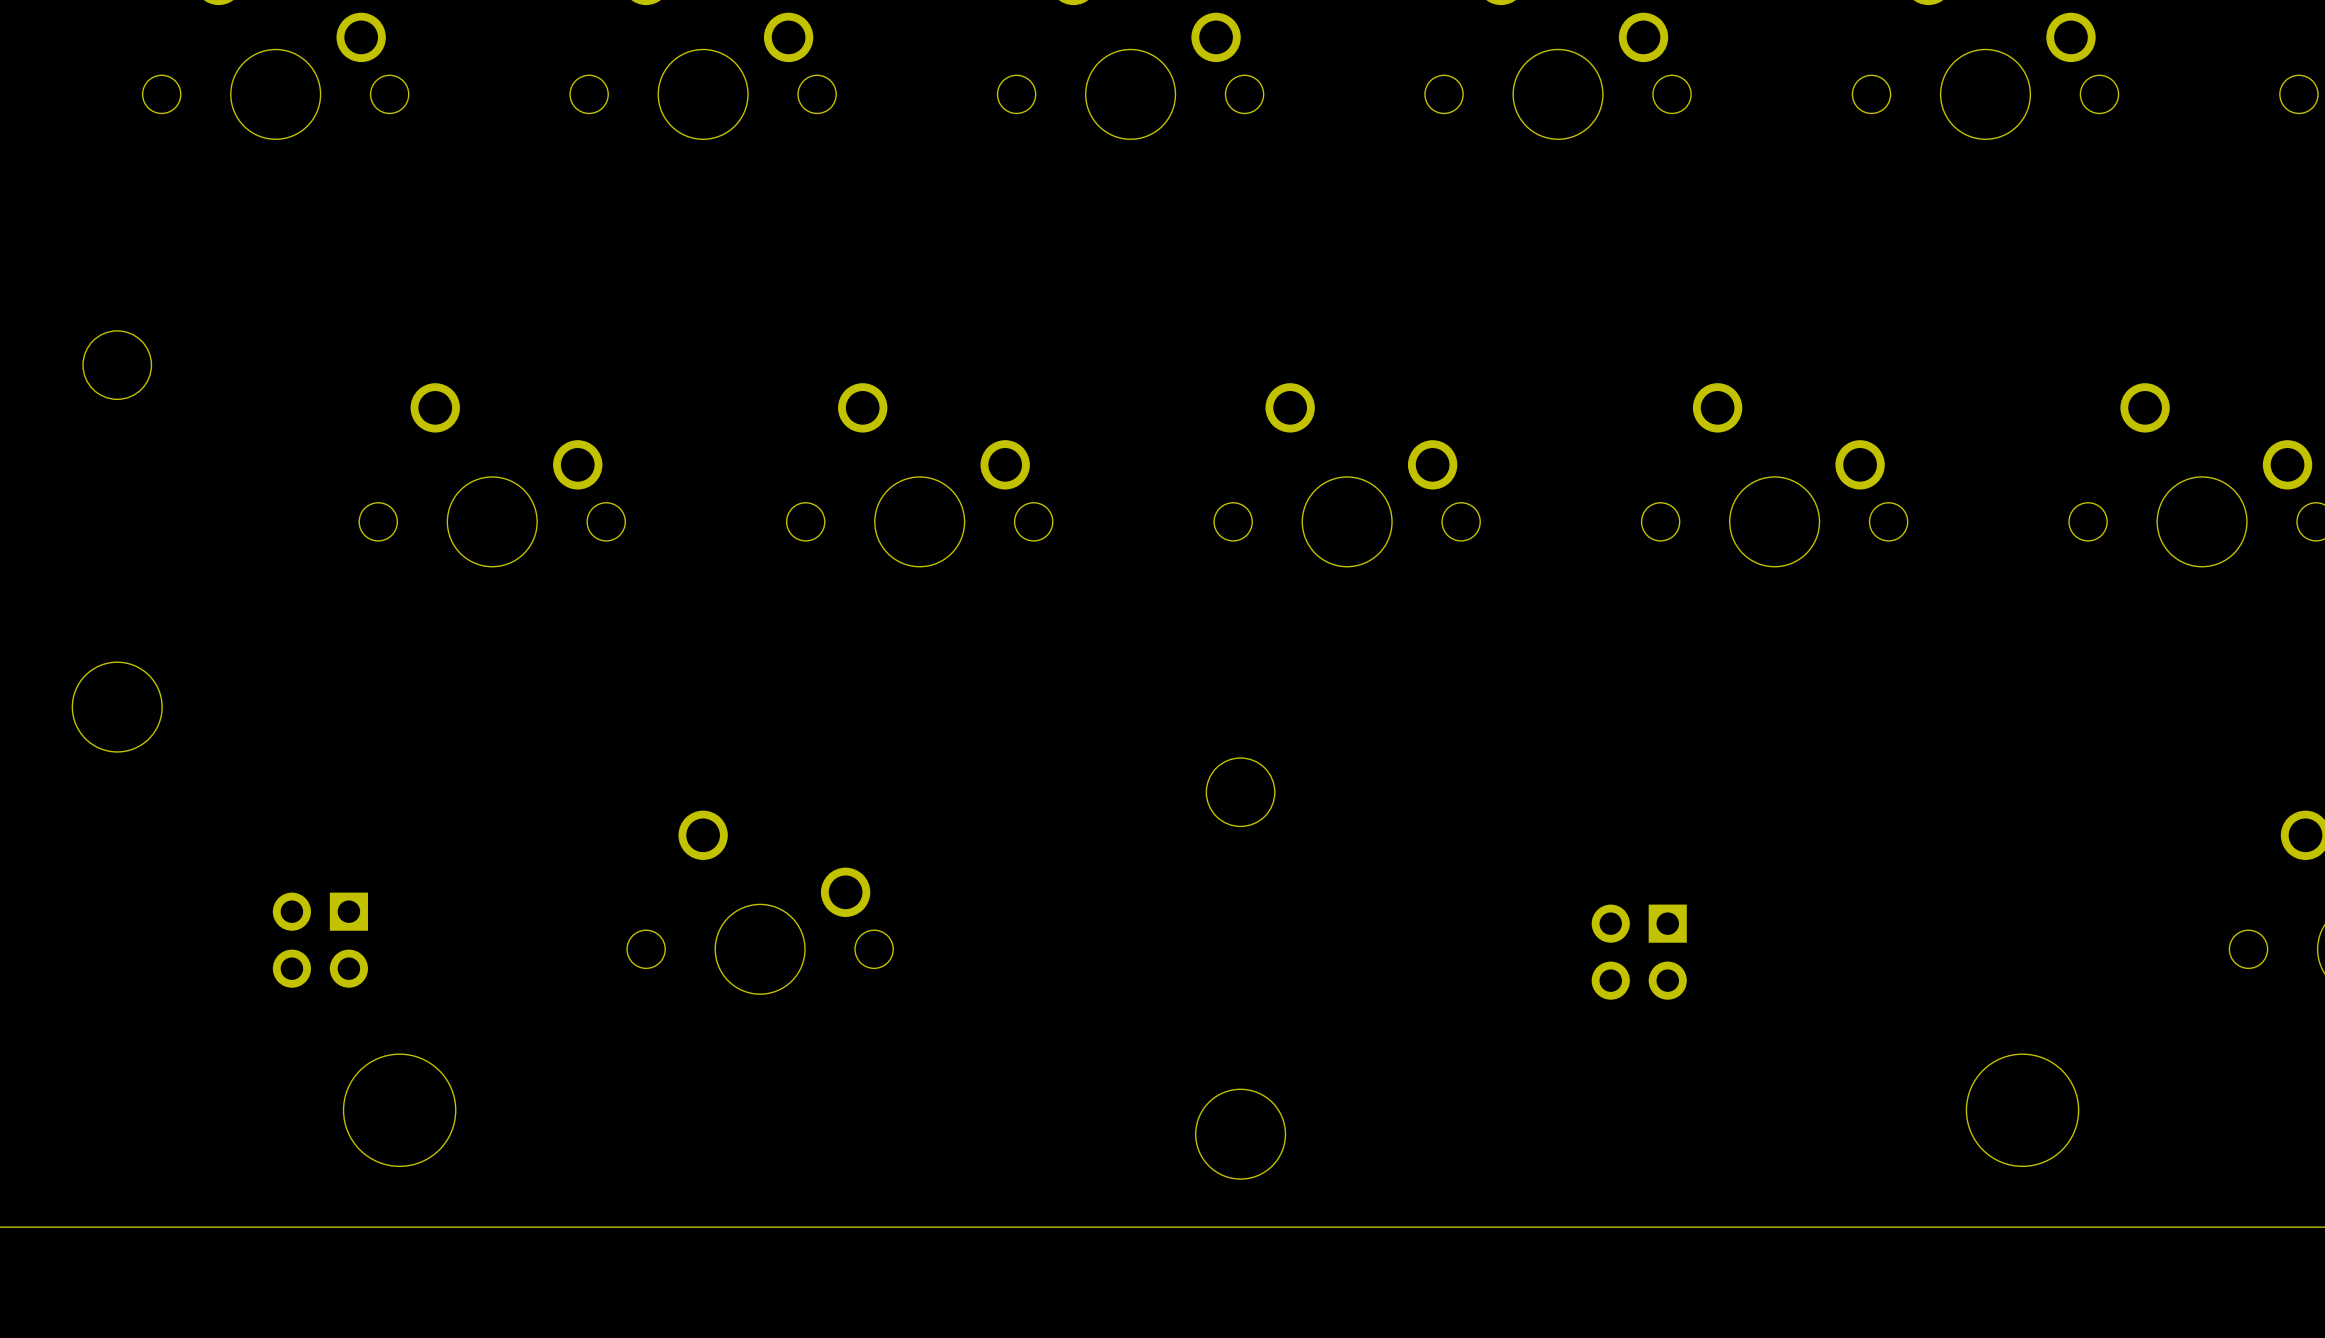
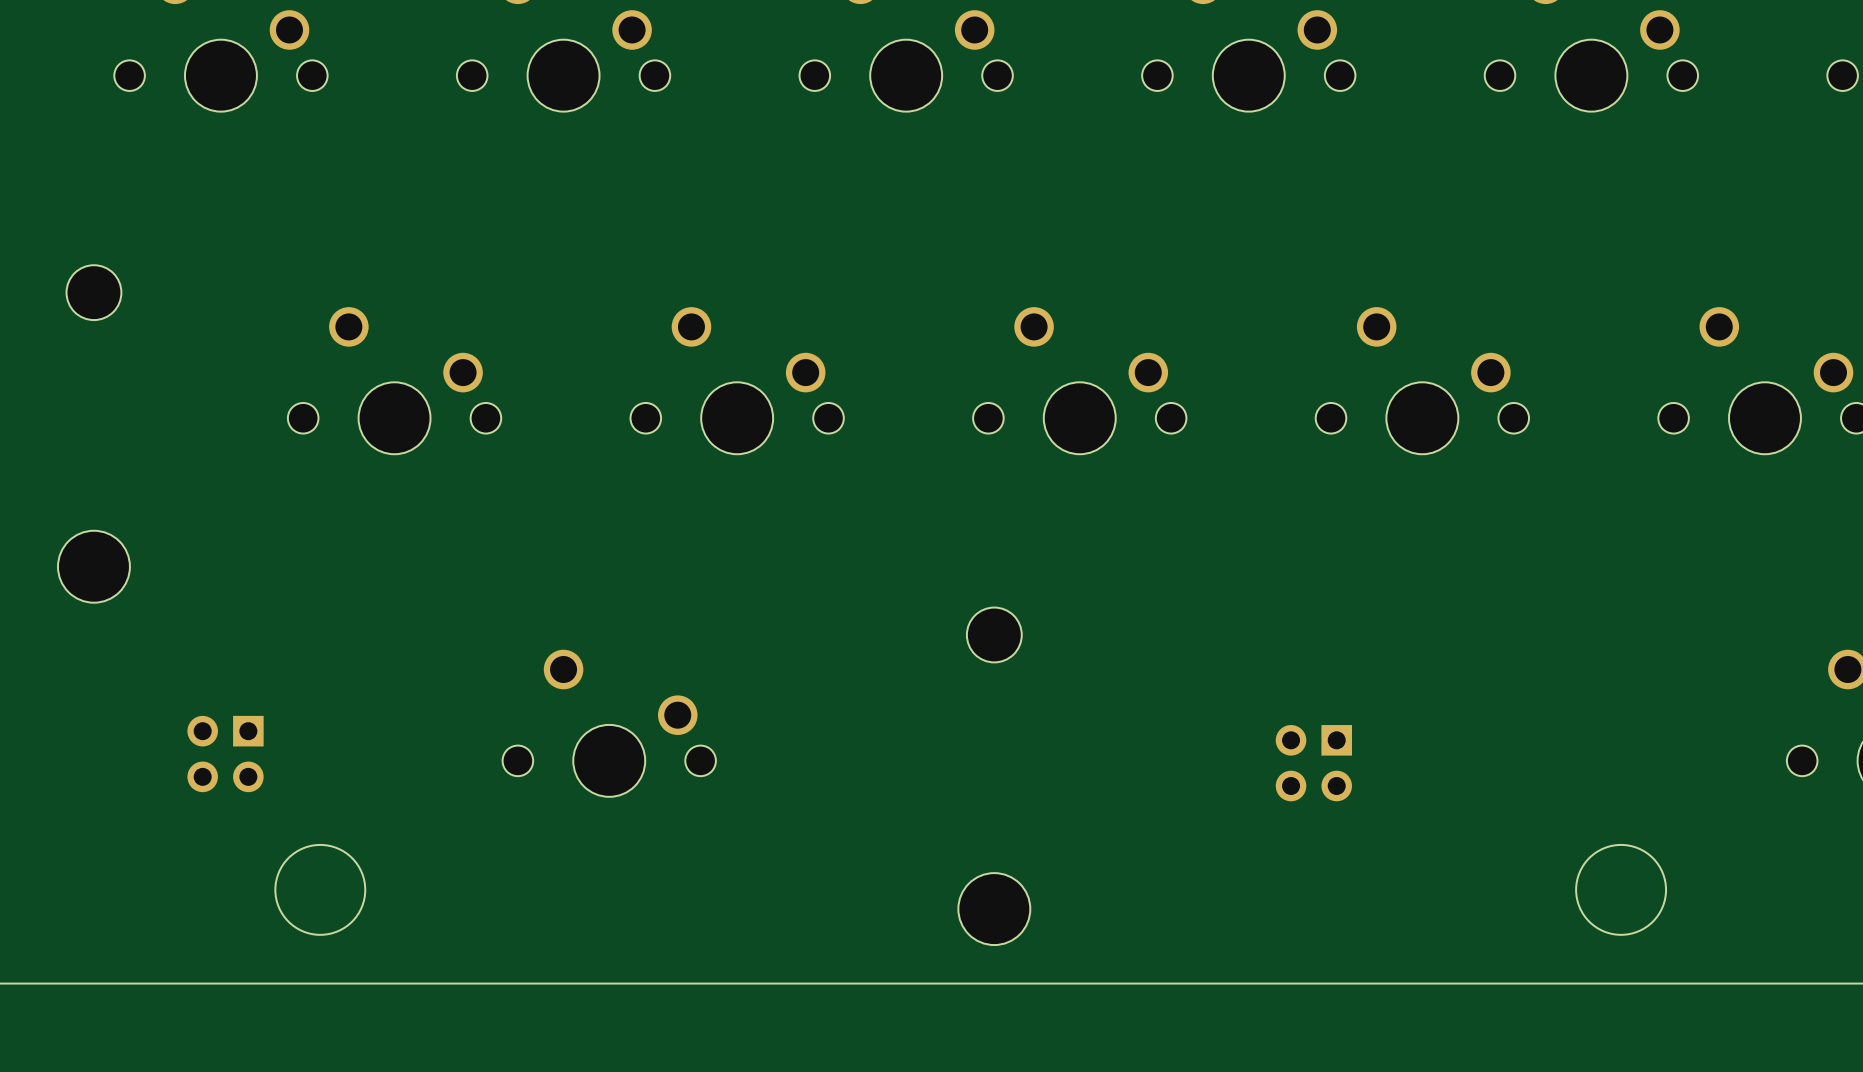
part position: (320, 940) -> (225, 754)

